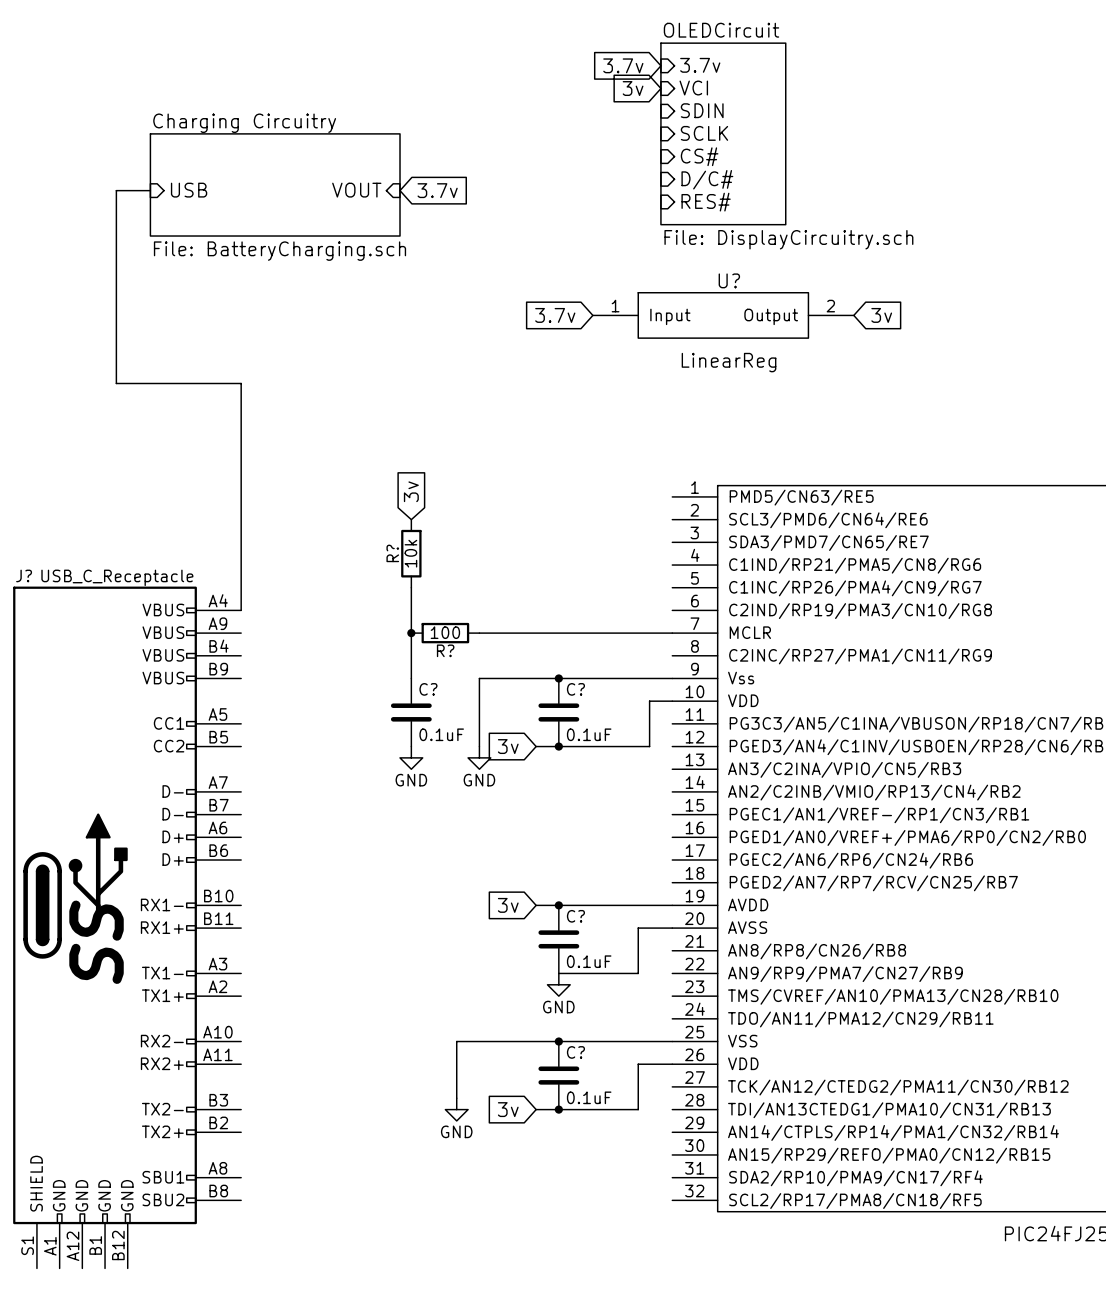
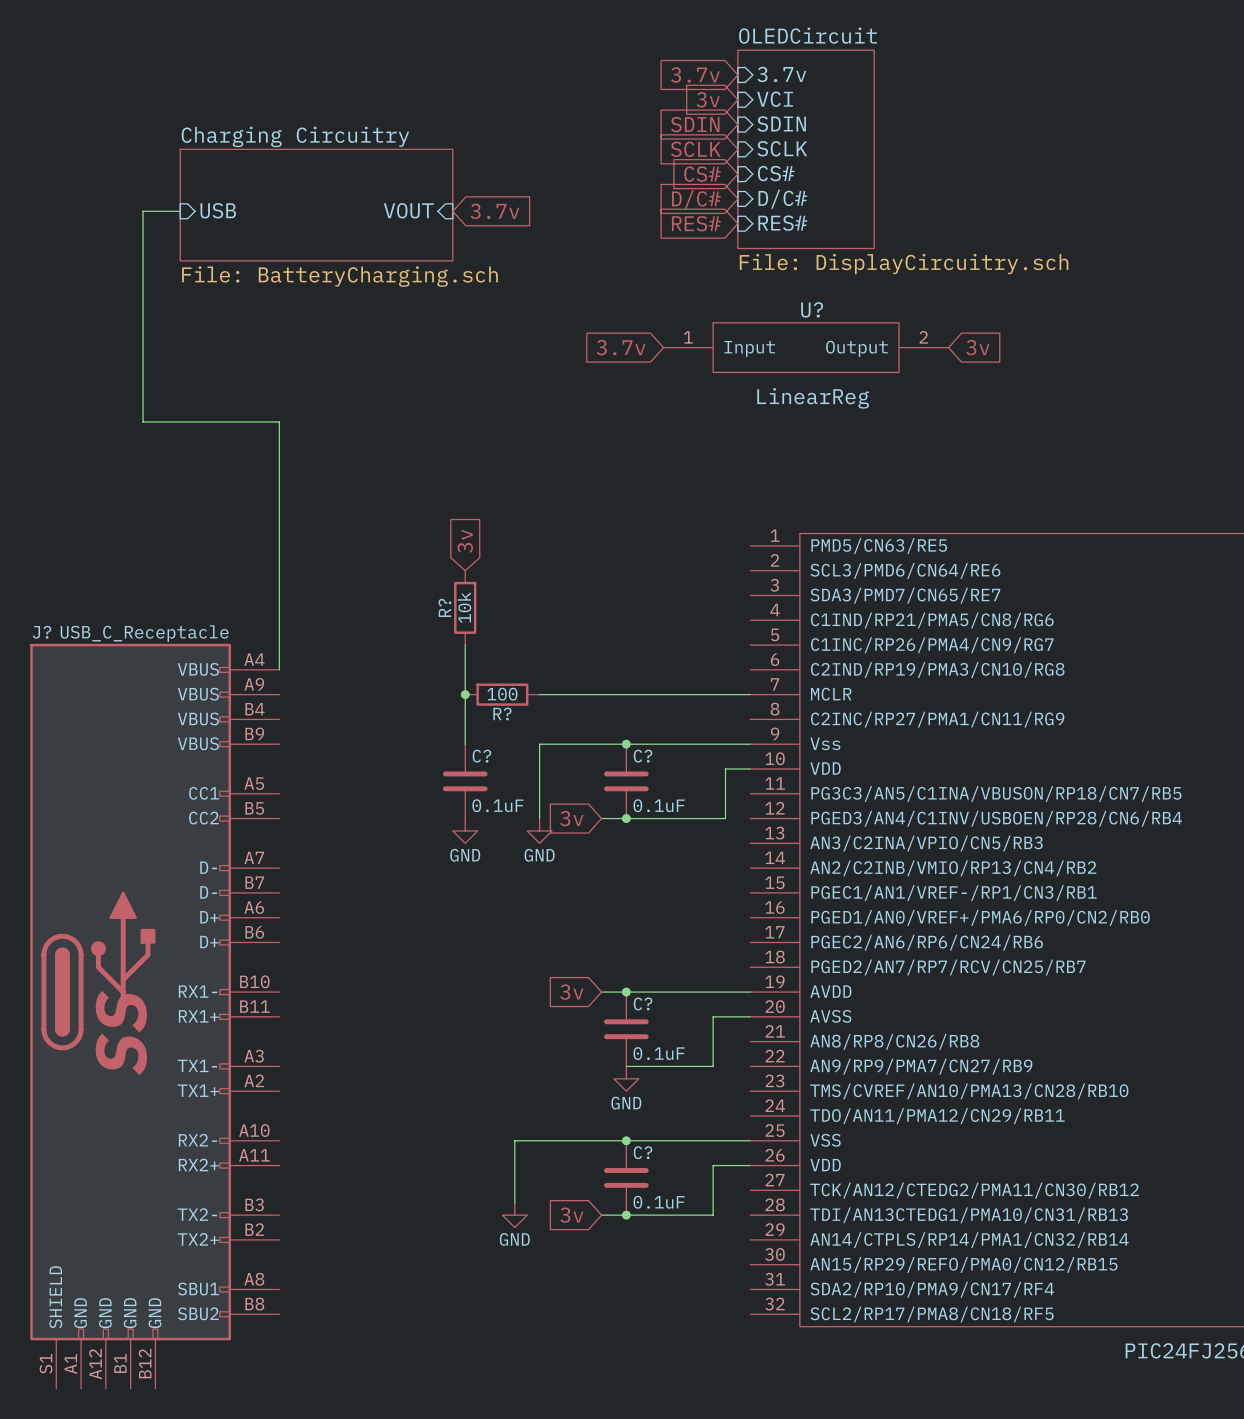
global label: none -> SDIN (695, 124)
global label: none -> SCLK (695, 149)
global label: none -> CS# (702, 174)
global label: none -> D/C# (696, 199)
global label: none -> RES# (696, 223)

